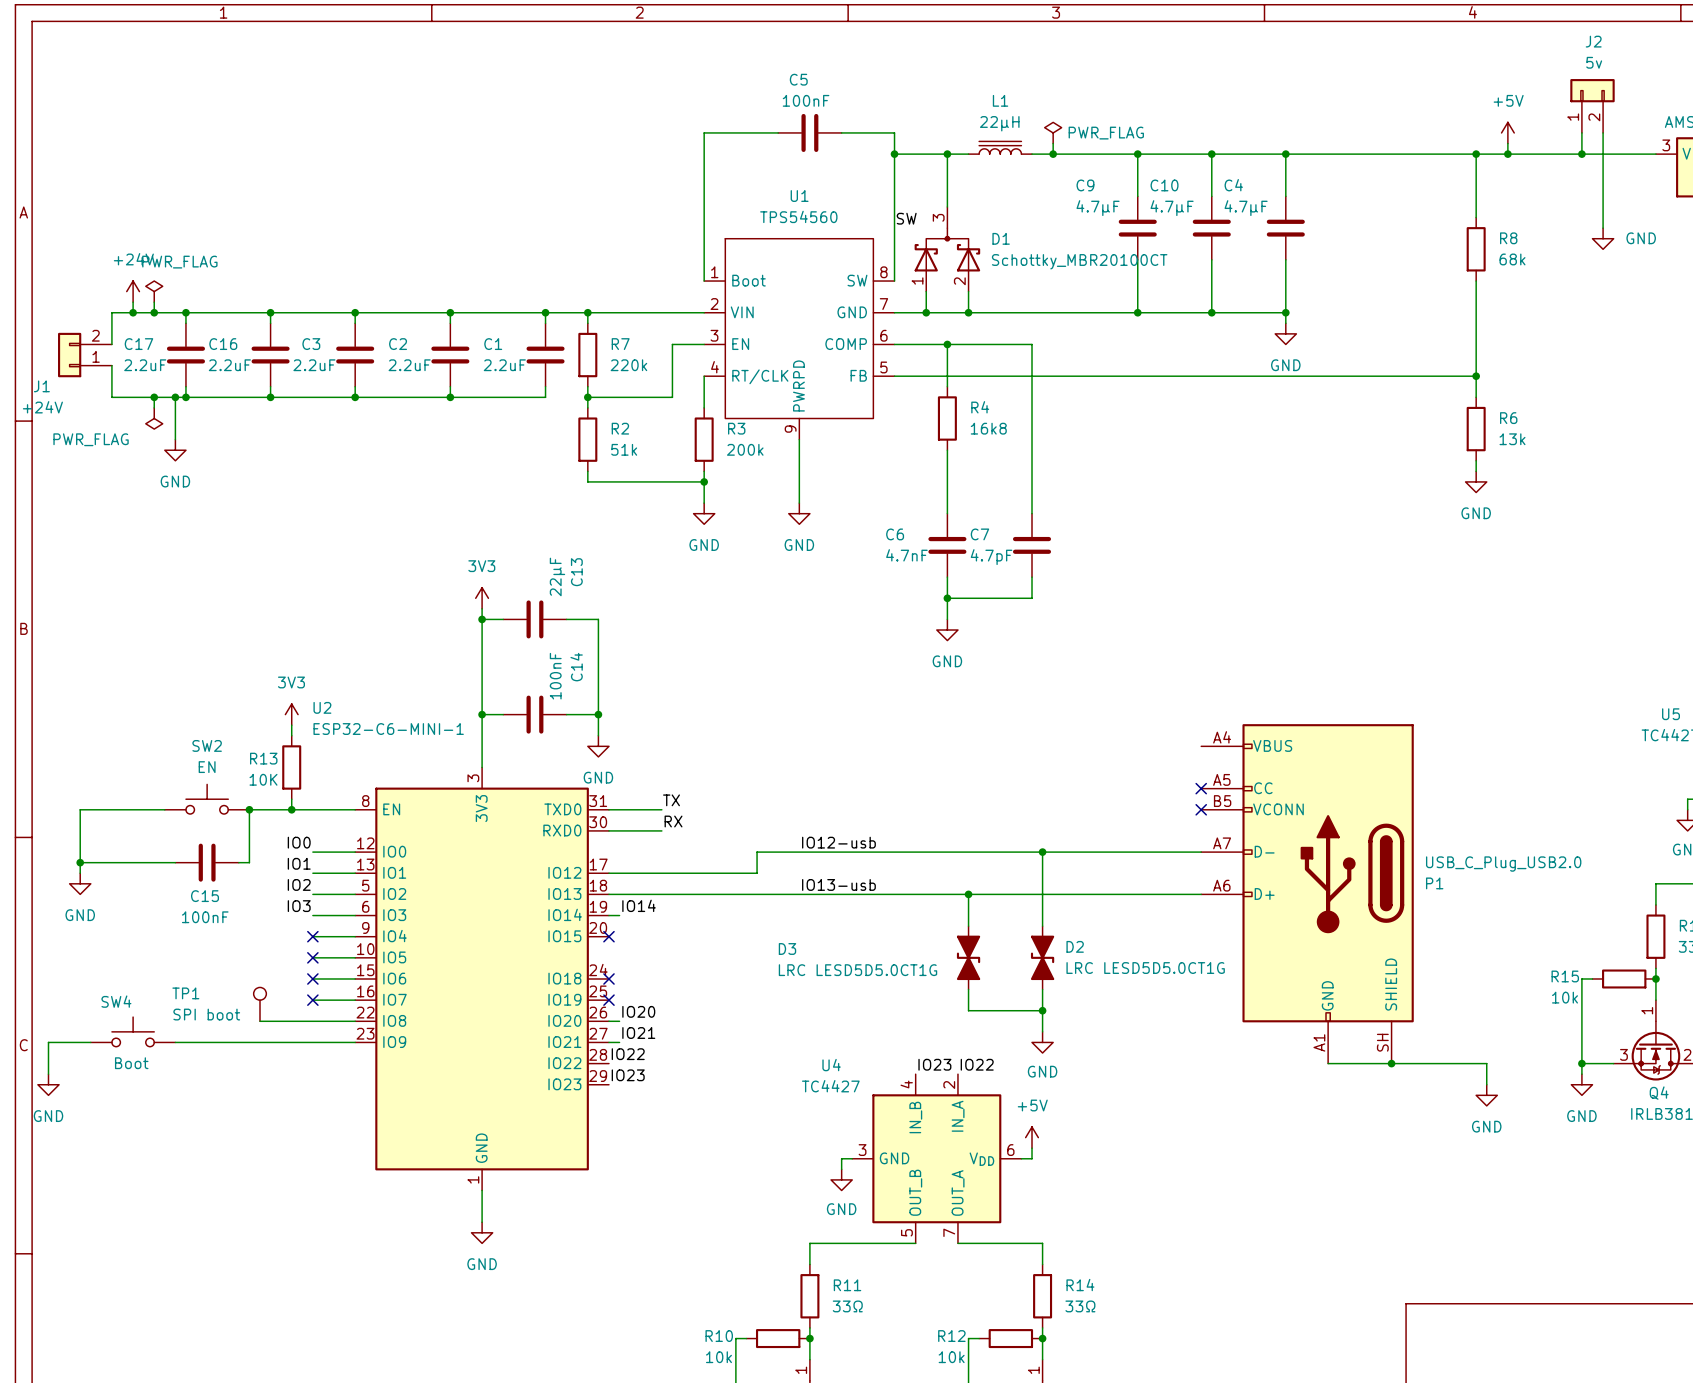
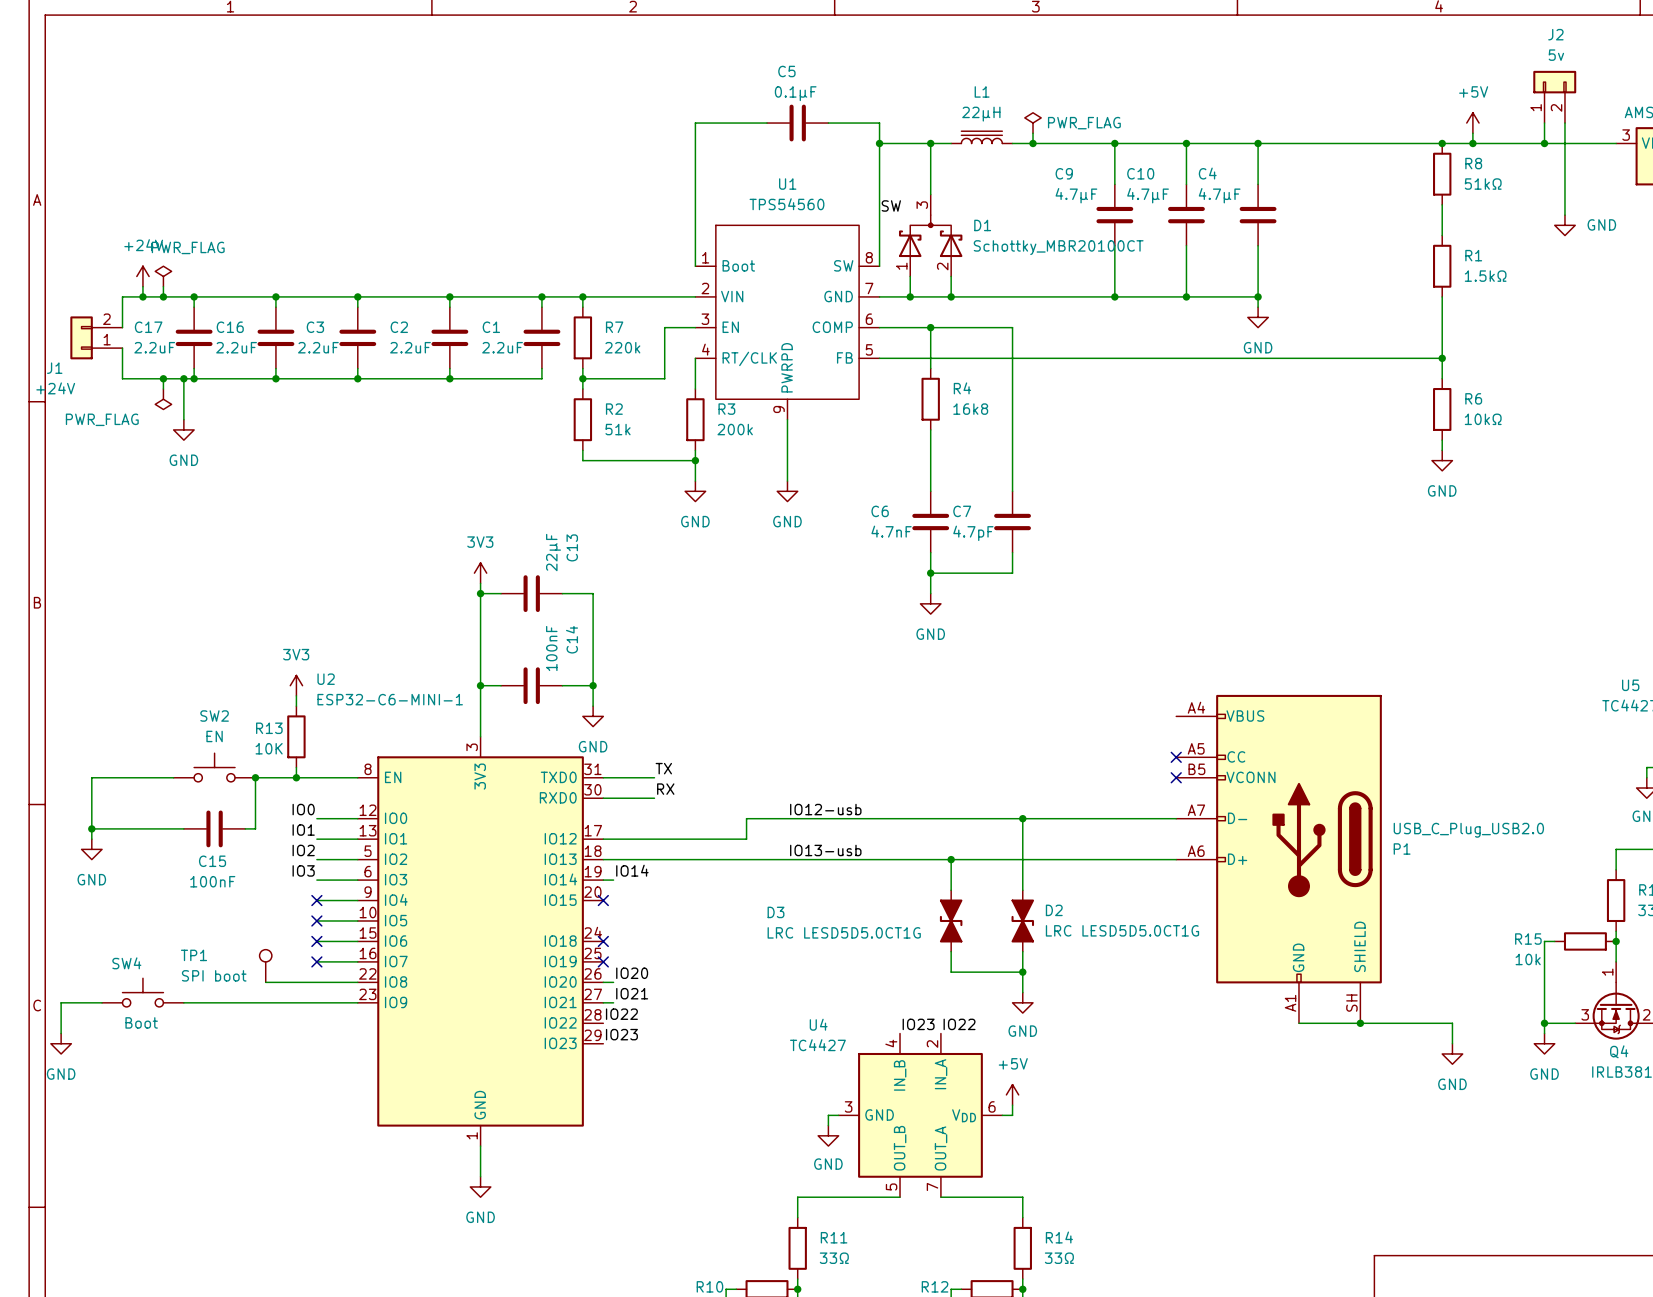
C5 value: 100nF (806, 100) -> 0.1μF (795, 93)
wire: (1476, 154) (1476, 217) -> (1442, 235) (1442, 204)
R8 position: (1476, 249) -> (1442, 174)
R8 value: 68k (1512, 259) -> 51kΩ (1483, 184)
wire: (1476, 281) (1476, 312) -> none
R1: none -> 1.5kΩ (1442, 266)
R6 value: 13k (1512, 439) -> 10kΩ (1483, 419)

